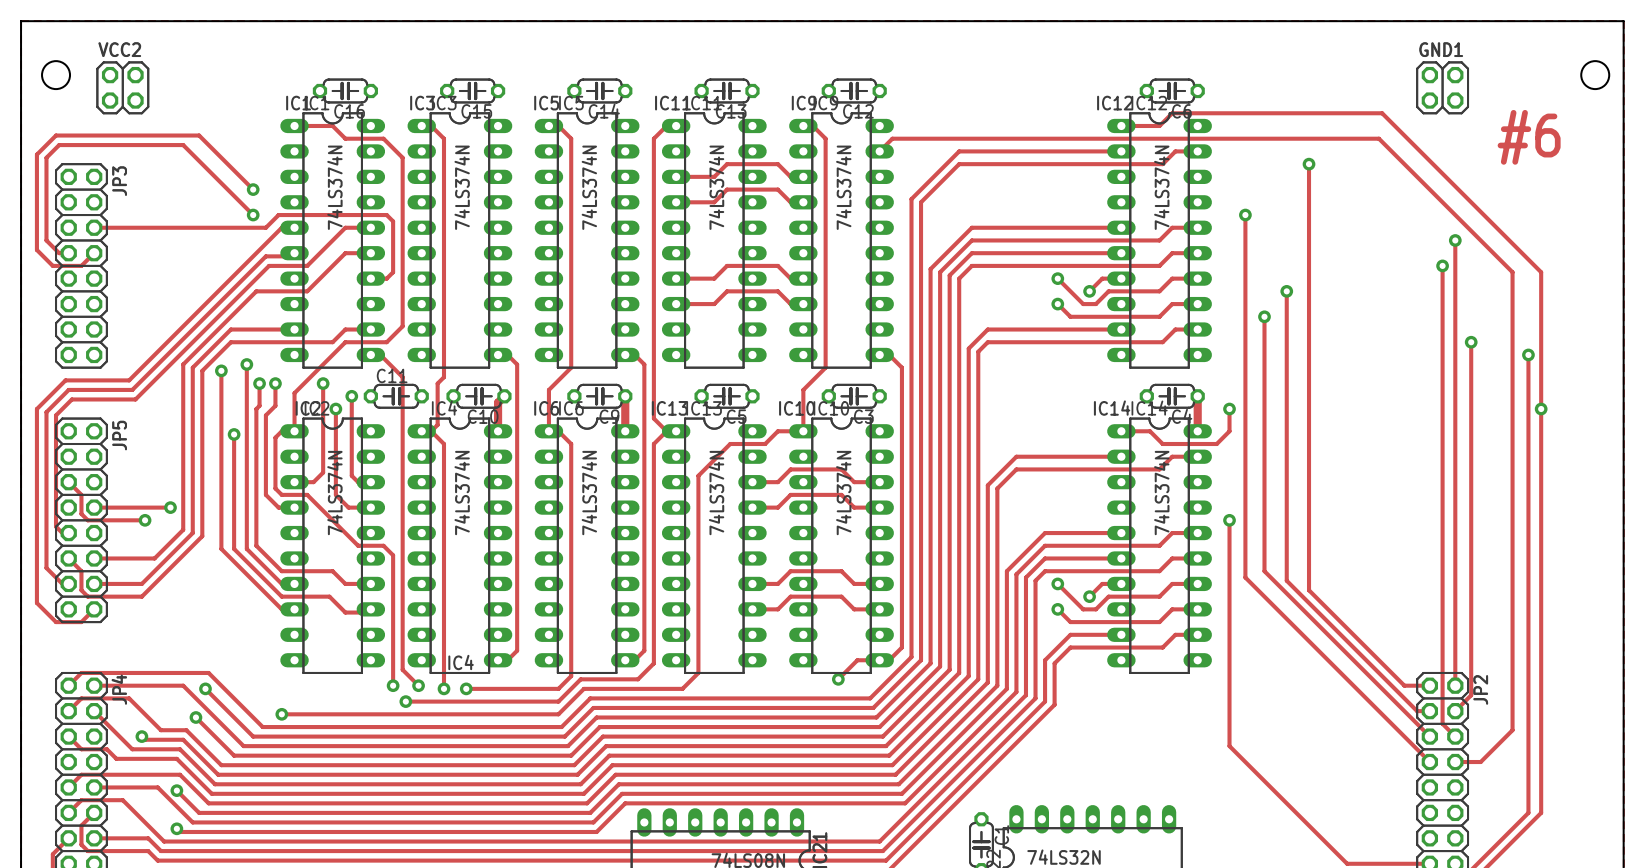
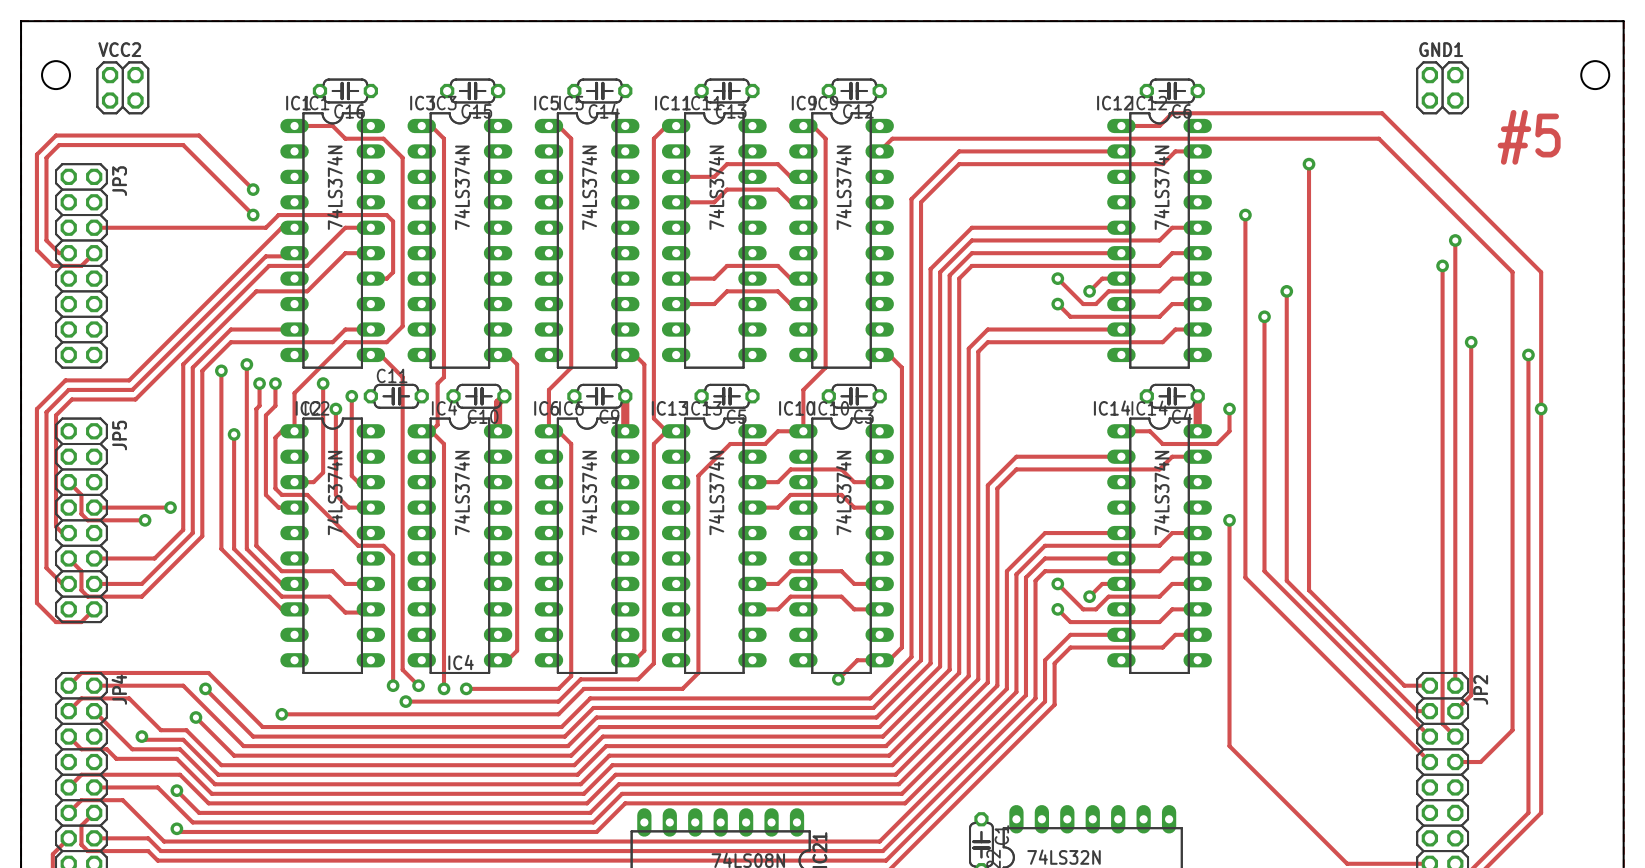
text: #6 (1529, 137) -> #5 (1529, 137)

